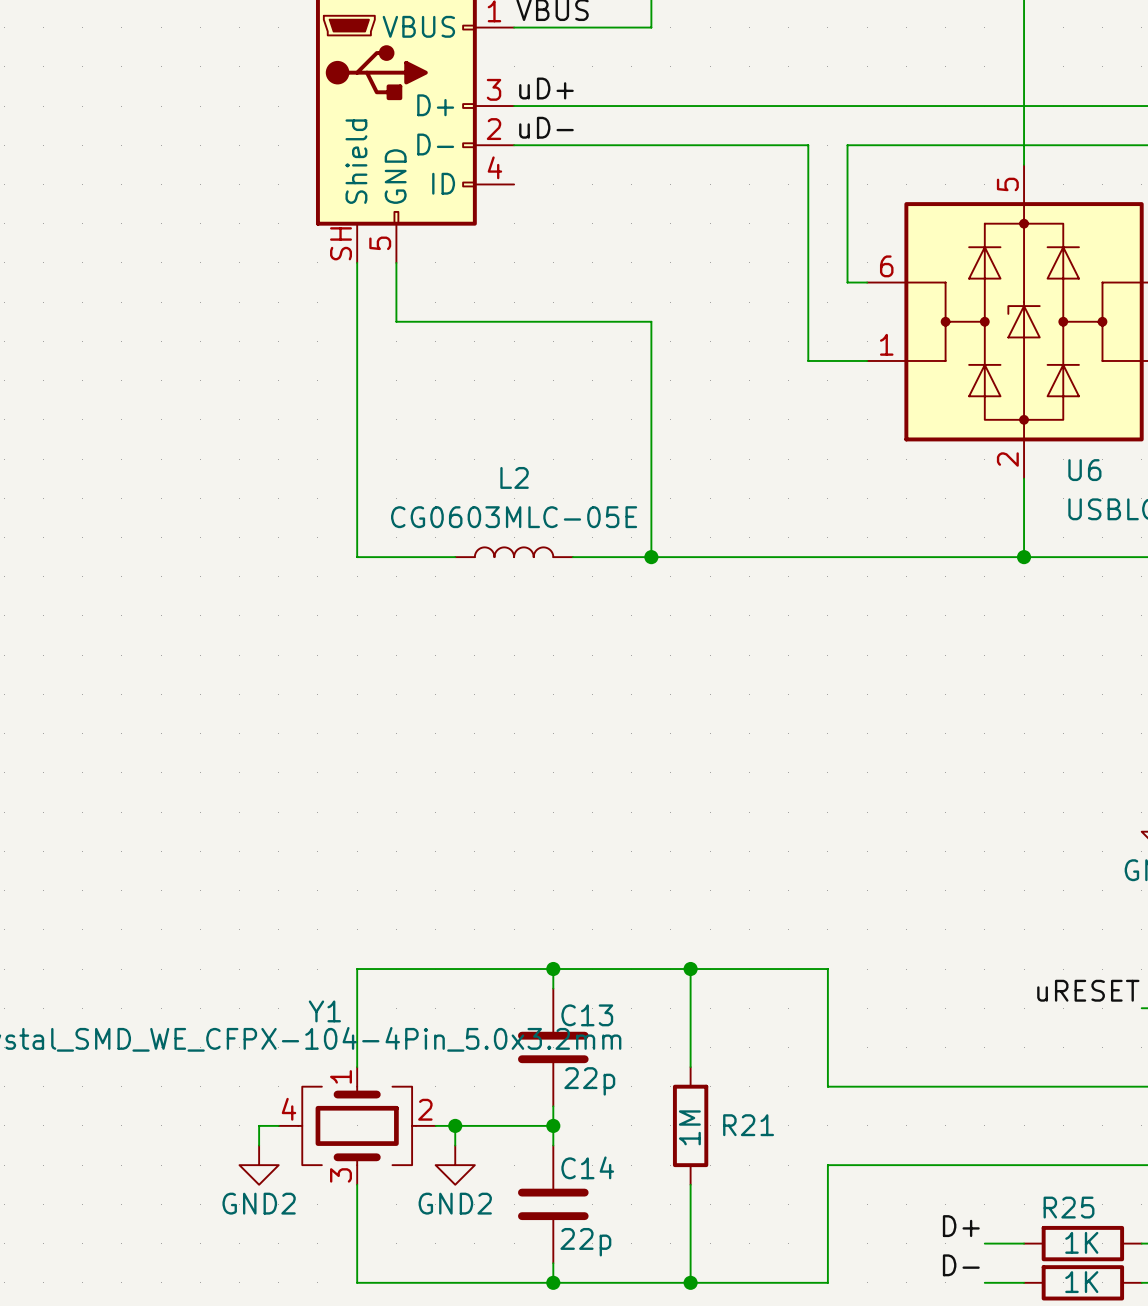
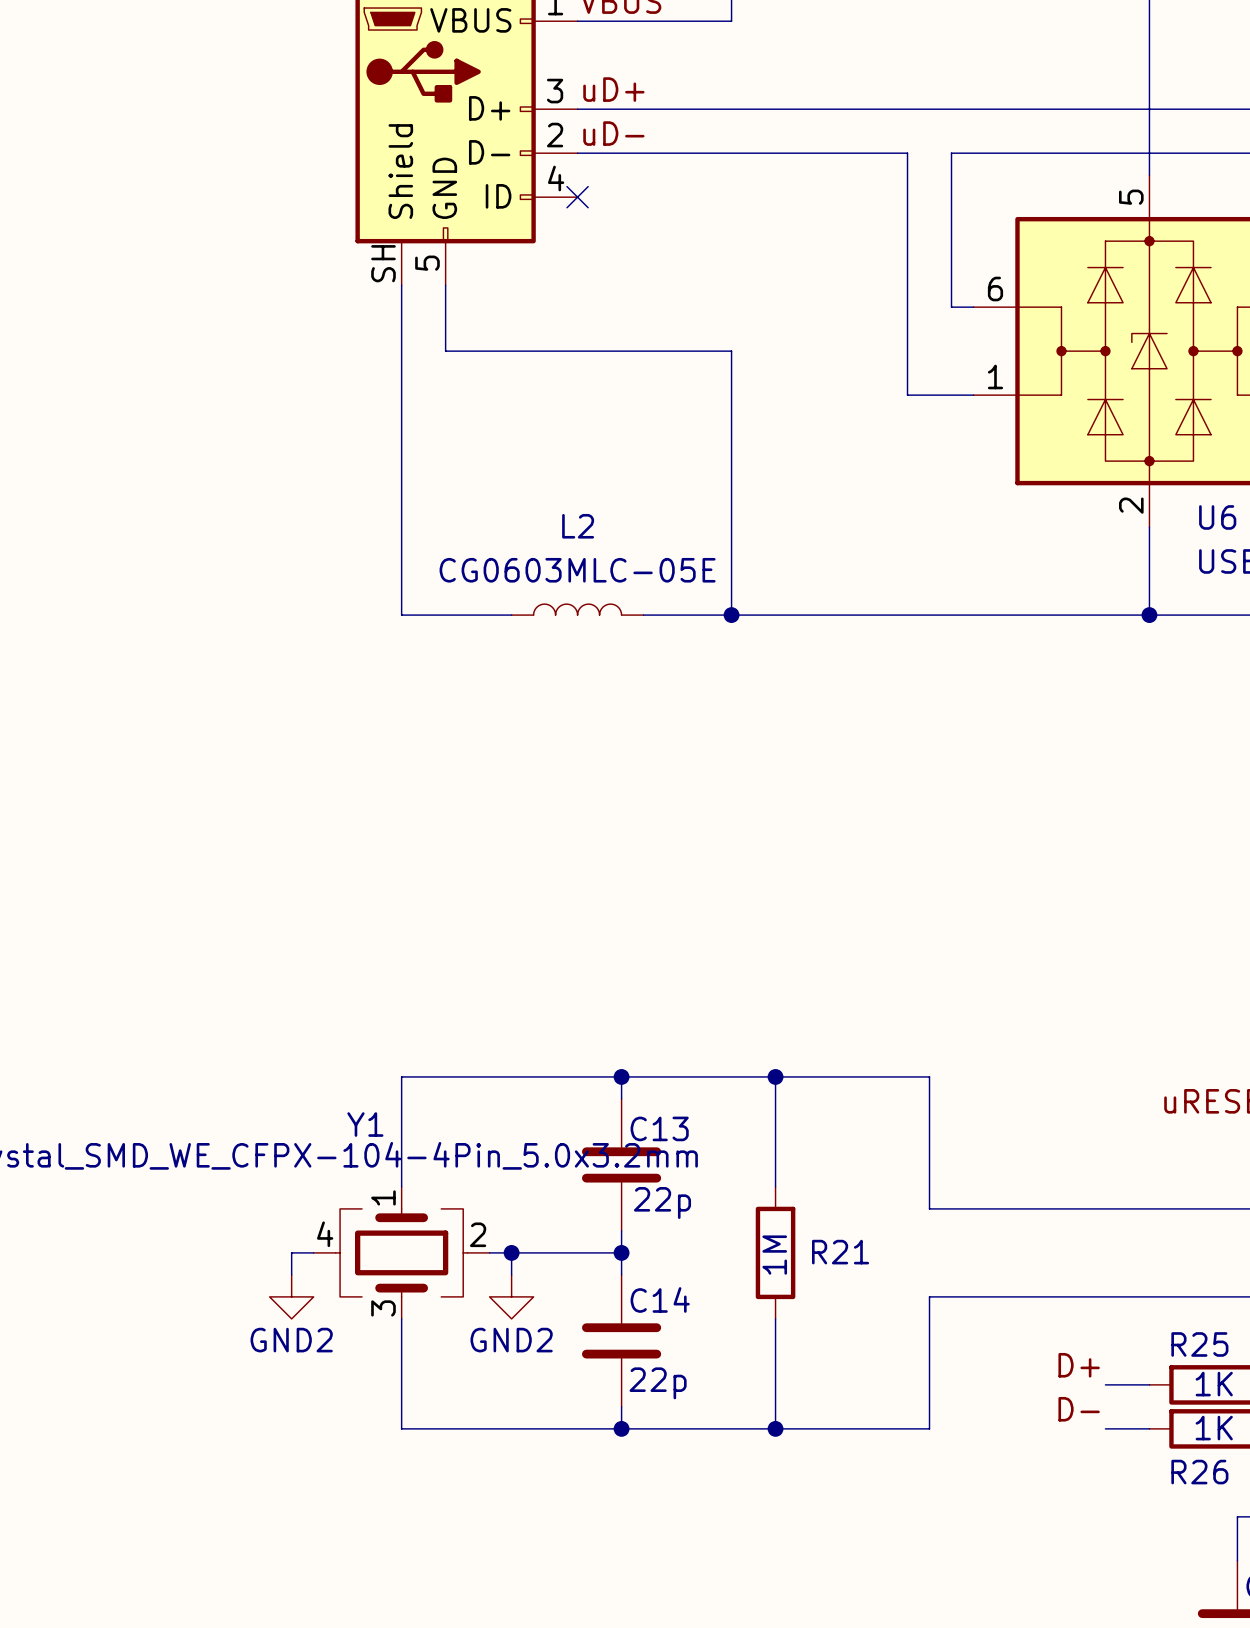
no-connect mark: none -> (577, 197)

